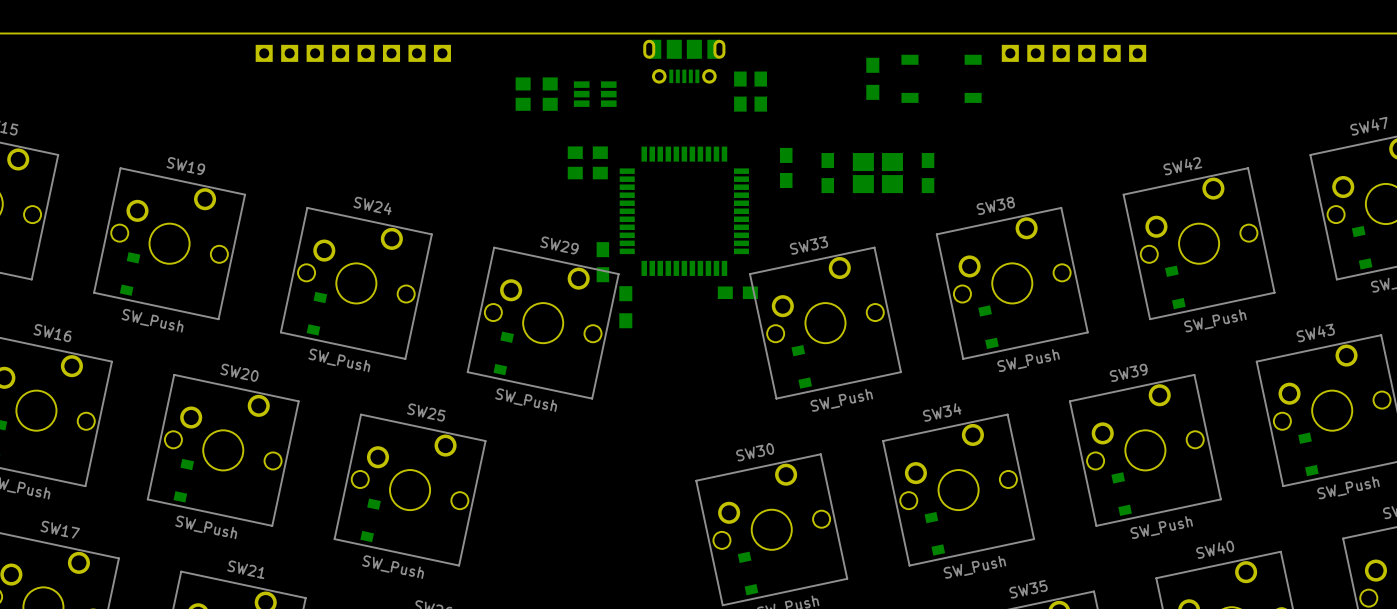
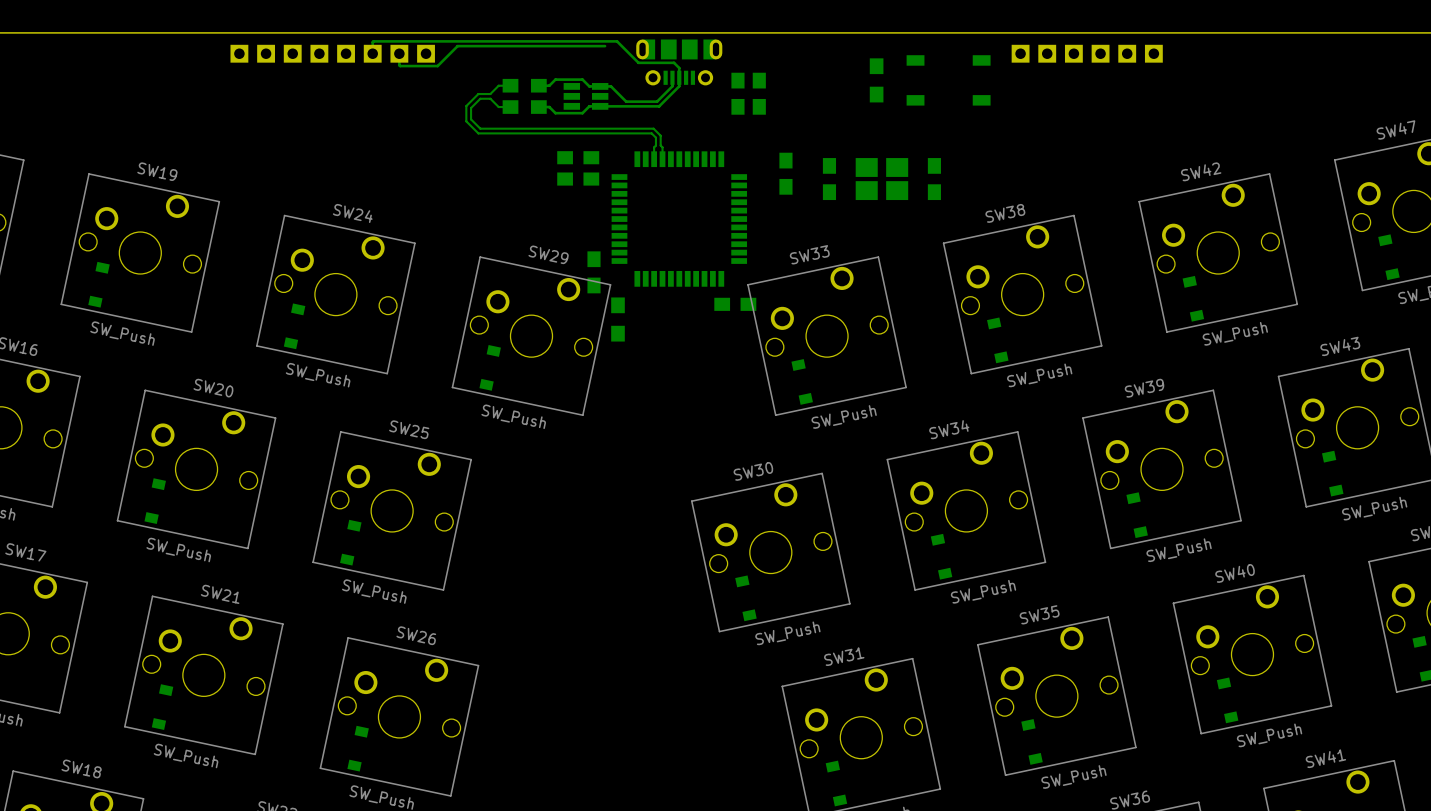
bottom track: none -> (605, 46) (457, 46) (437, 66) (400, 66) (399, 53)
bottom track: none -> (372, 53) (373, 41) (617, 41) (638, 62) (674, 62) (679, 68) (679, 86) (659, 106) (589, 106) (582, 113) (555, 113) (549, 107) (538, 107)
bottom track: none -> (672, 77) (672, 86) (657, 101) (626, 101) (610, 86) (589, 86) (582, 79) (555, 79) (549, 85) (538, 85)
bottom track: none -> (510, 85) (498, 85) (490, 94) (478, 94) (466, 106) (466, 121) (478, 133) (651, 133) (655, 137) (654, 159)
bottom track: none -> (510, 107) (498, 107) (490, 98) (480, 98) (471, 108) (471, 119) (480, 128) (653, 128) (660, 135) (662, 159)

